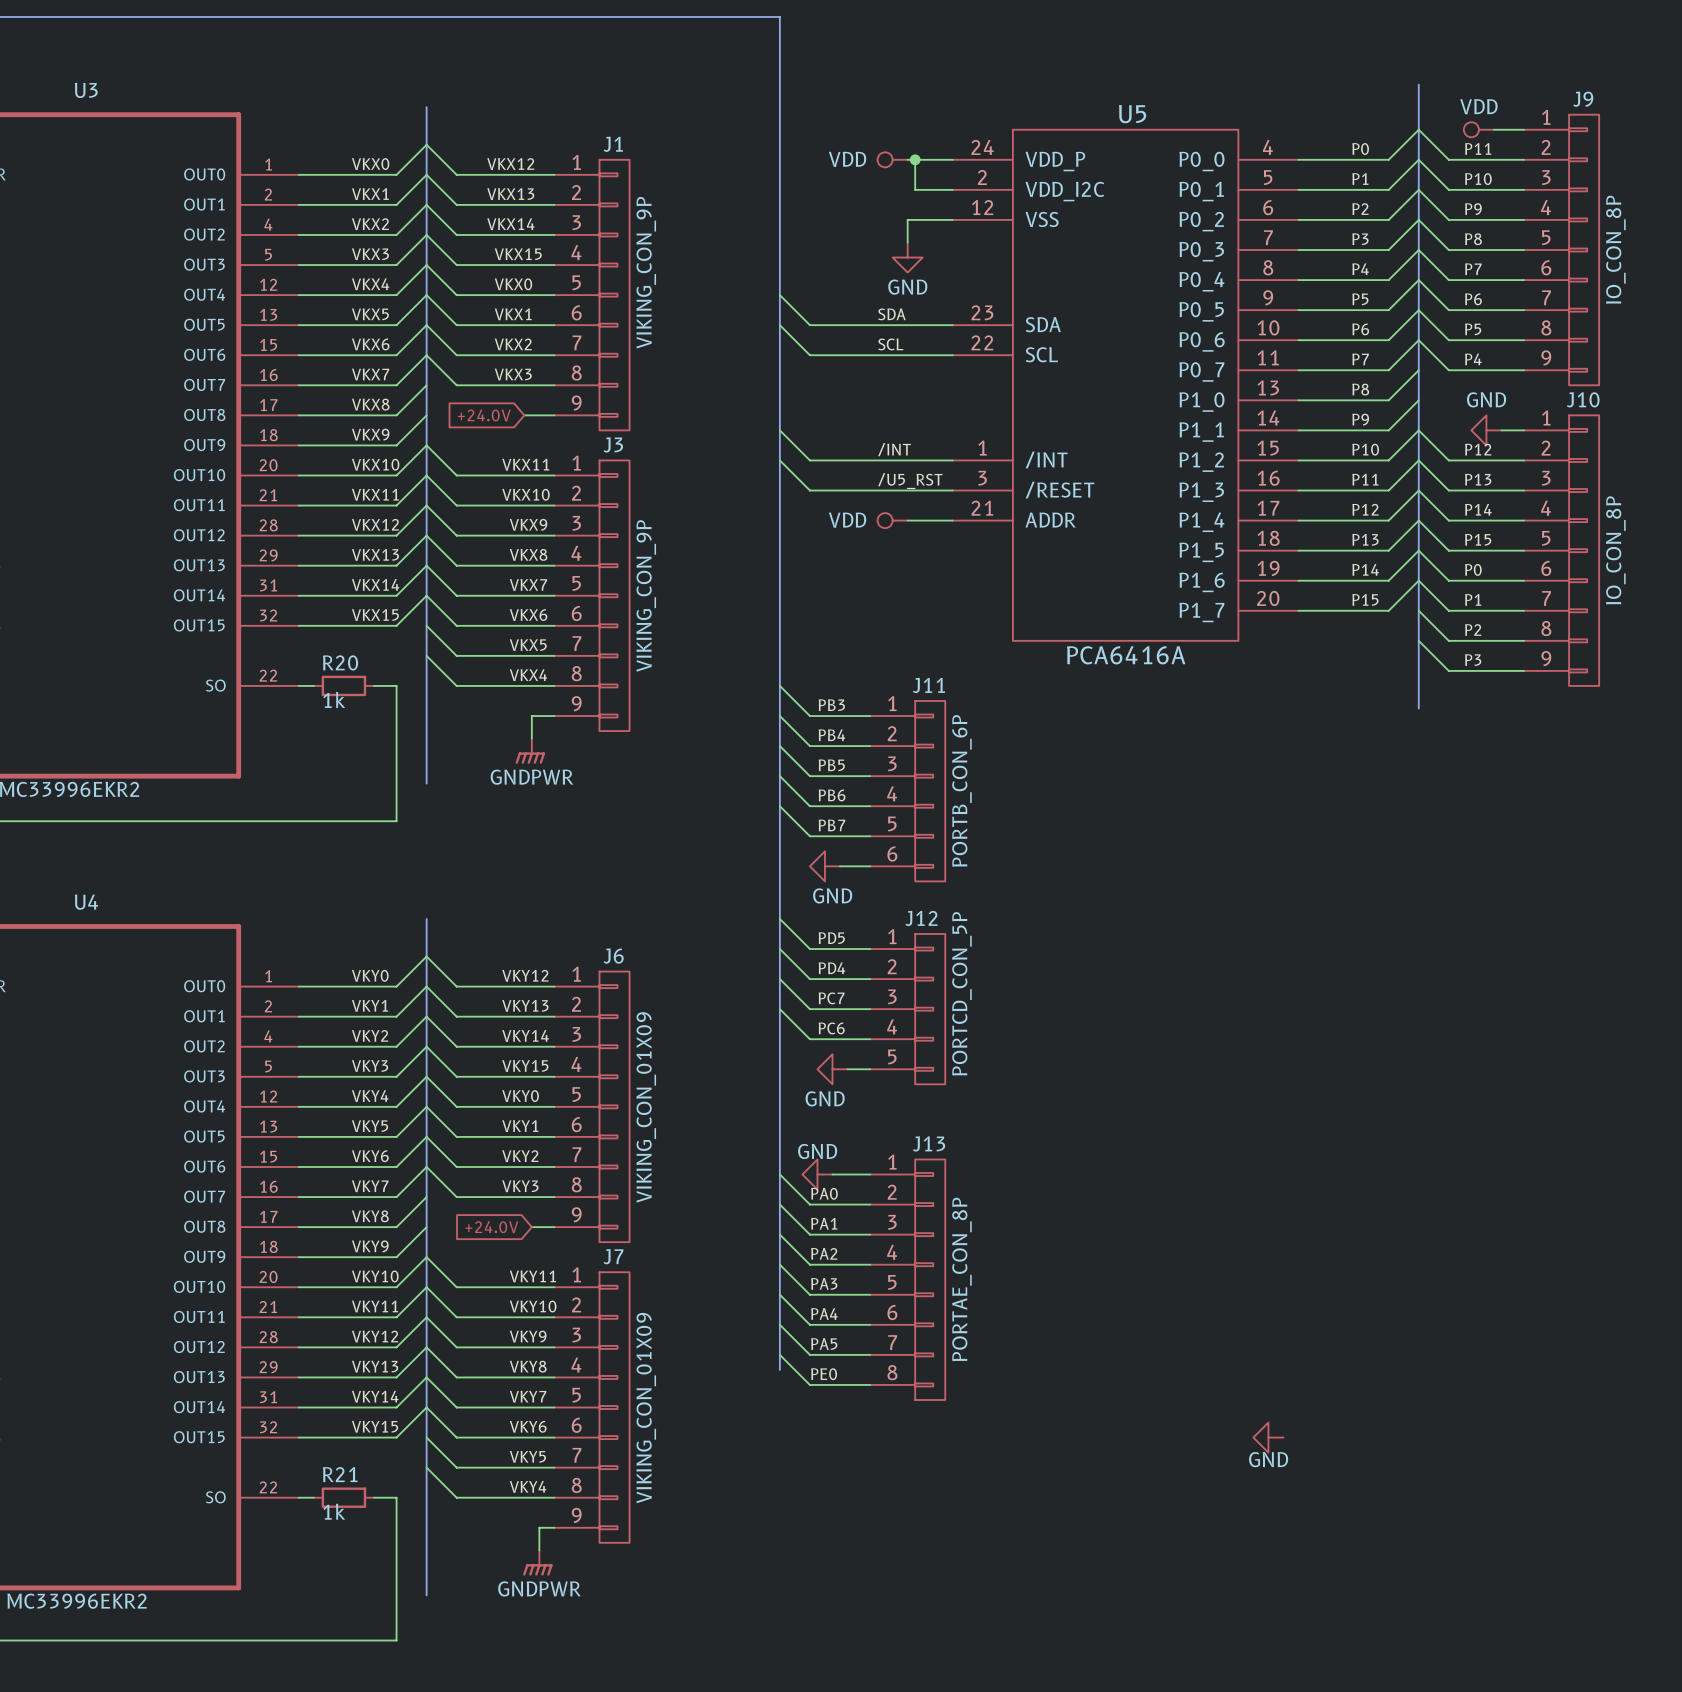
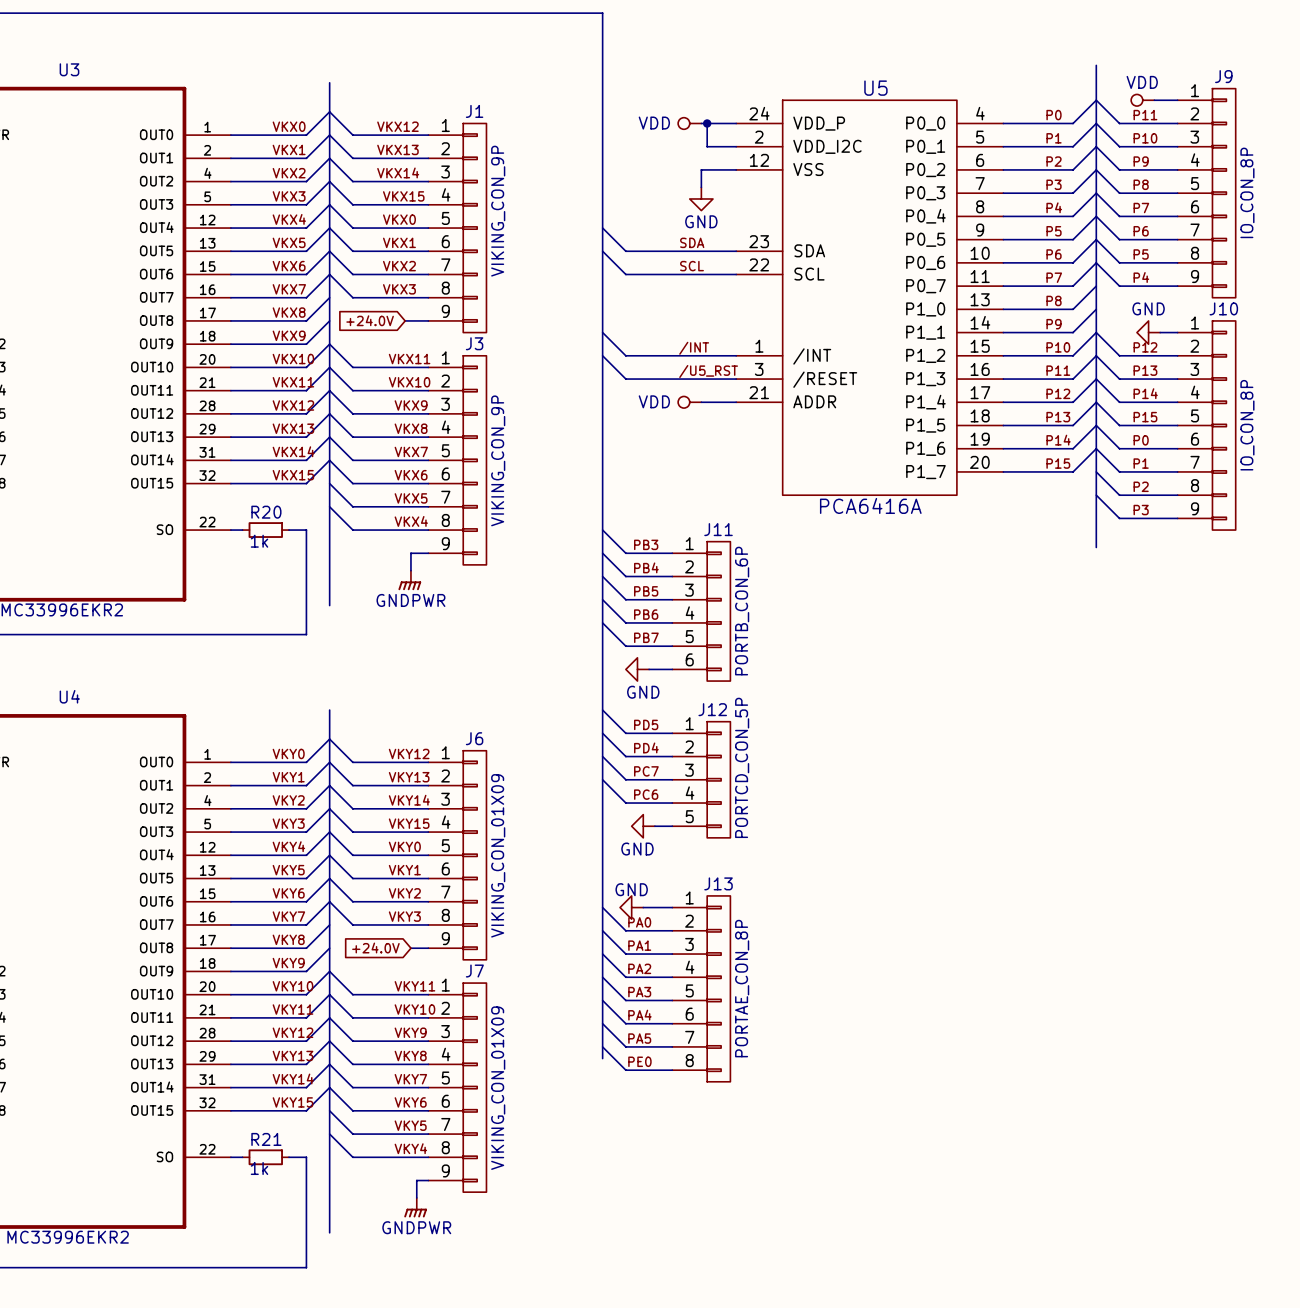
power symbol: GND (1268, 1437) -> none

